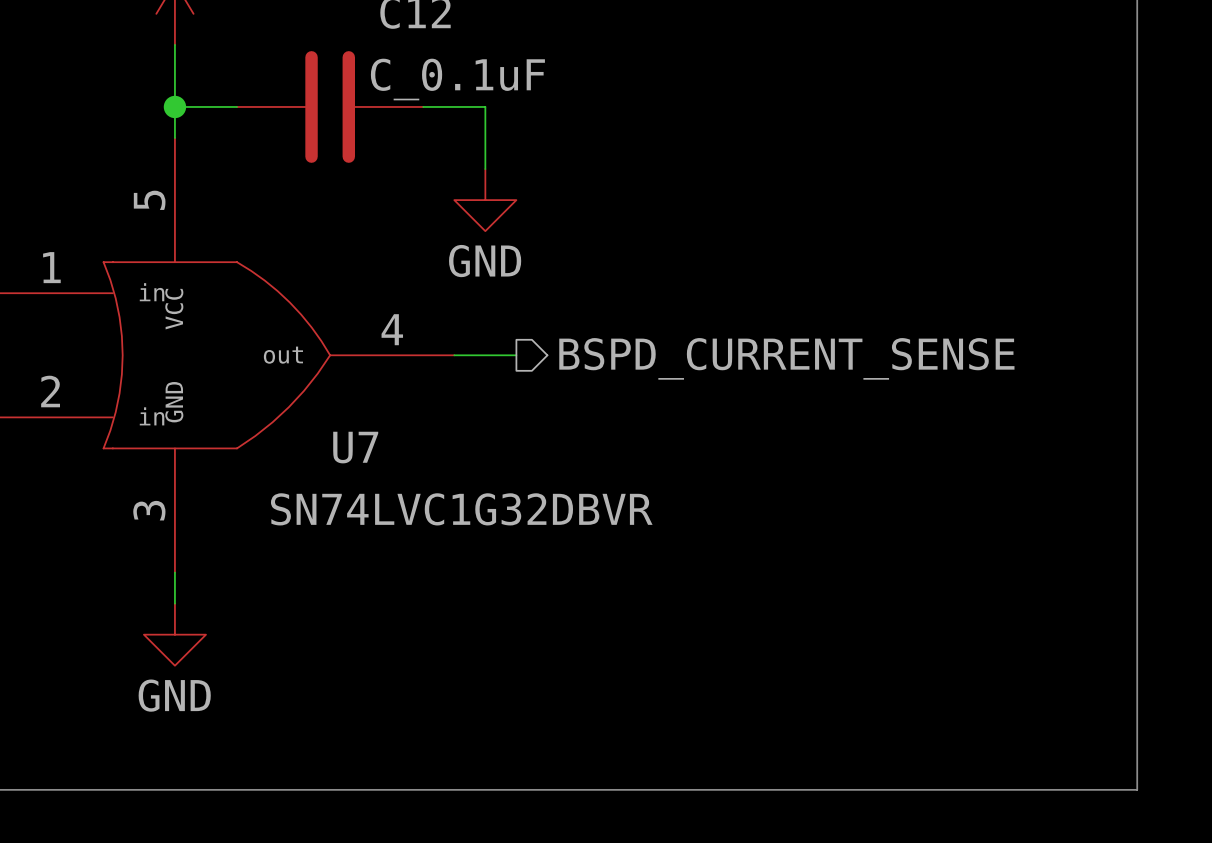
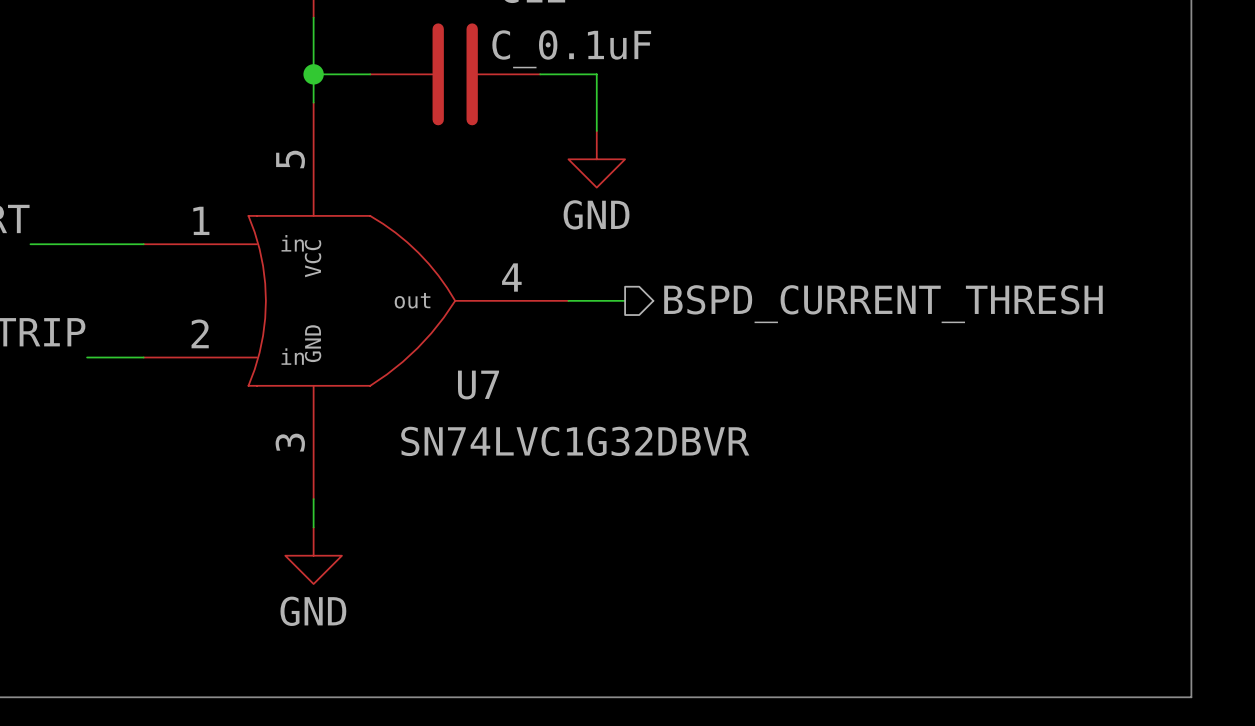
hierarchical label: BSPD_CURRENT_SENSE (786, 358) -> BSPD_CURRENT_THRESH (883, 304)

